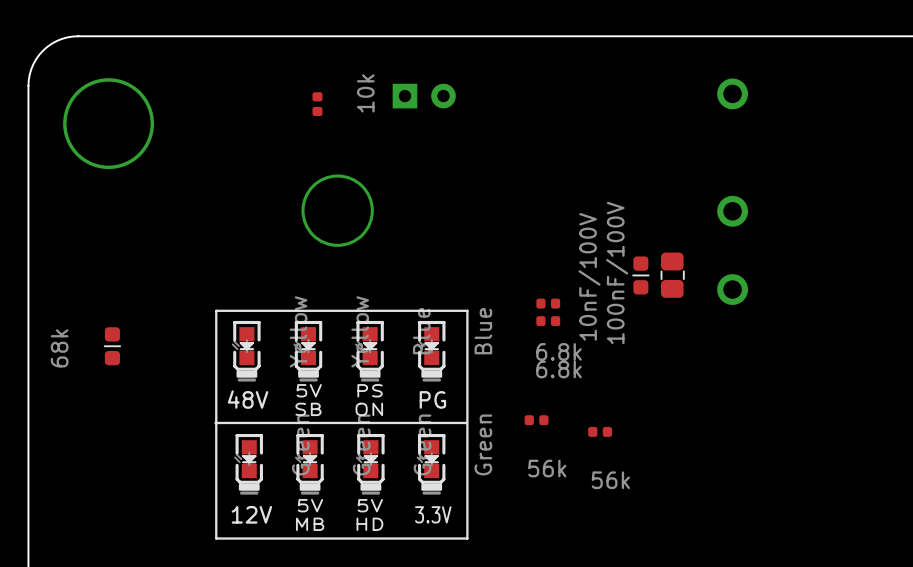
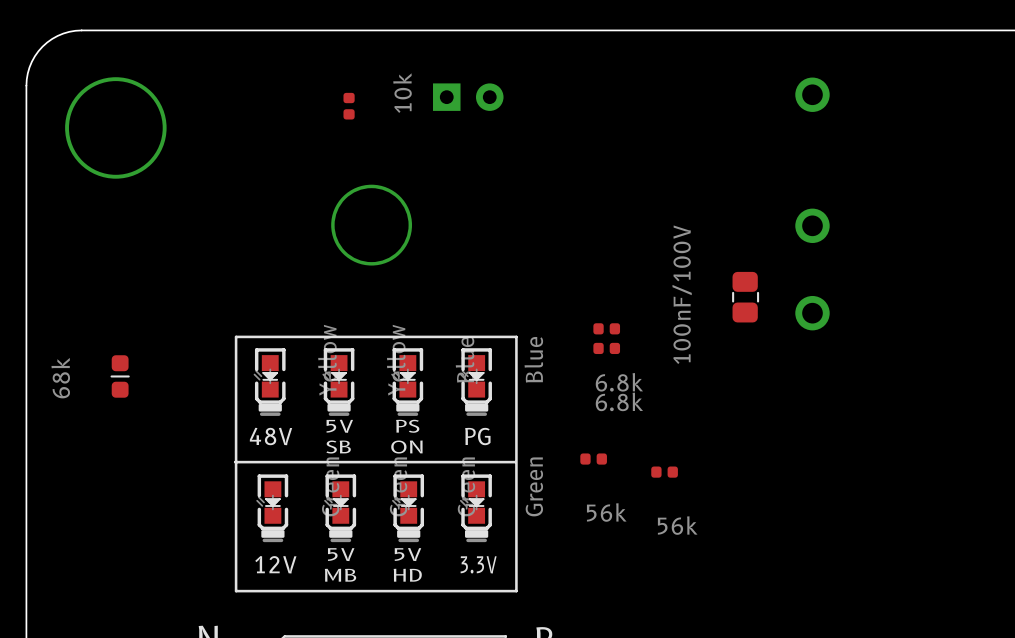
part: 10nF/100V (640, 275) -> none

